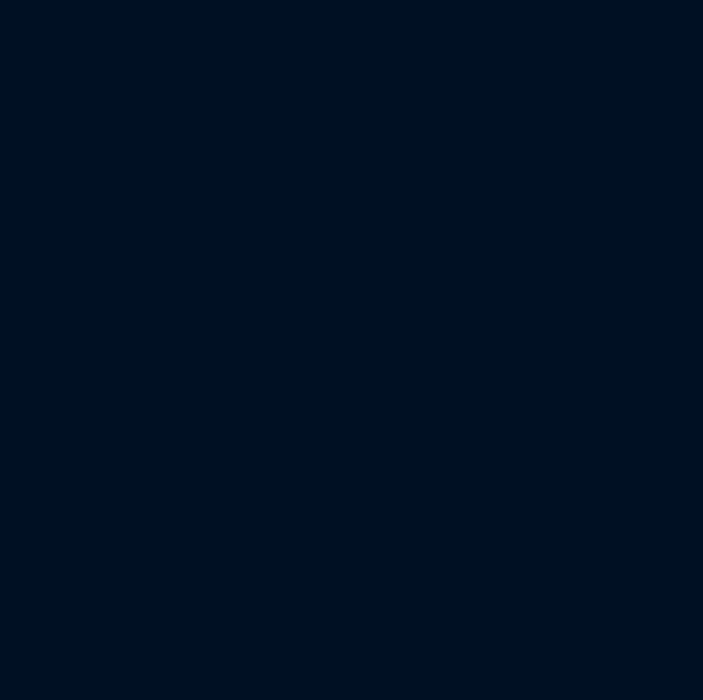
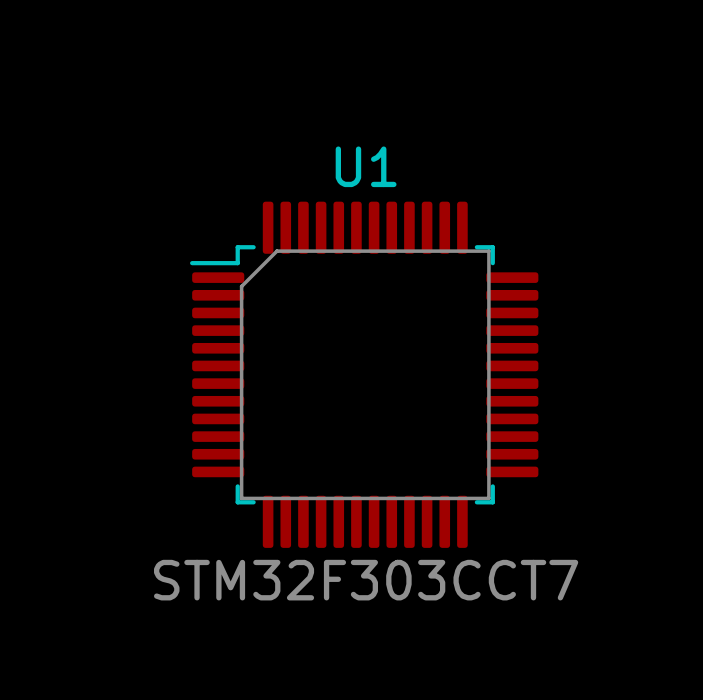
U1: none -> STM32F303CCT7 (364, 374)

